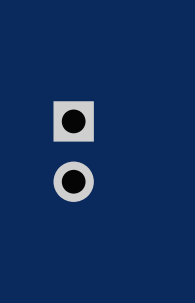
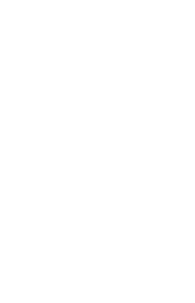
part: (73, 151) -> none

